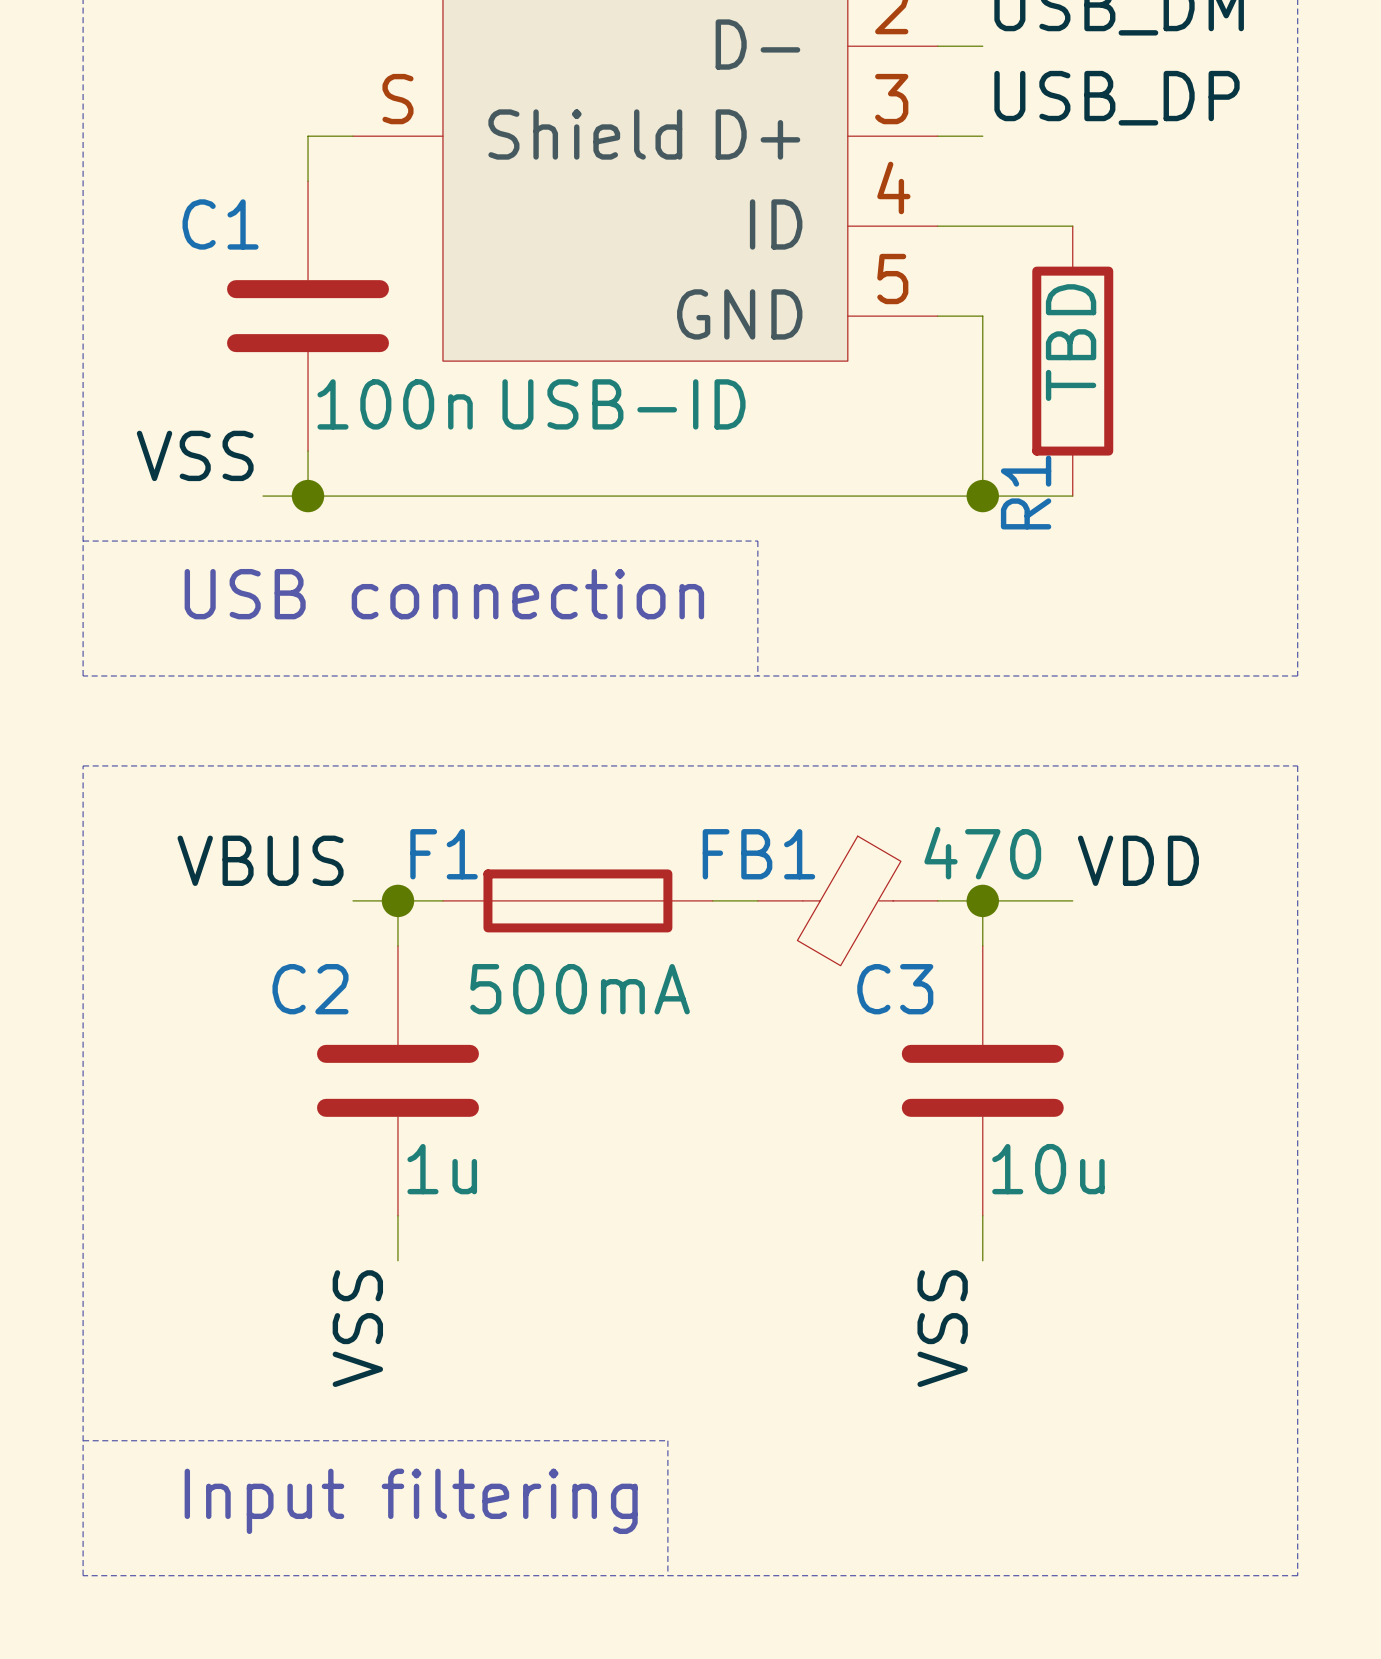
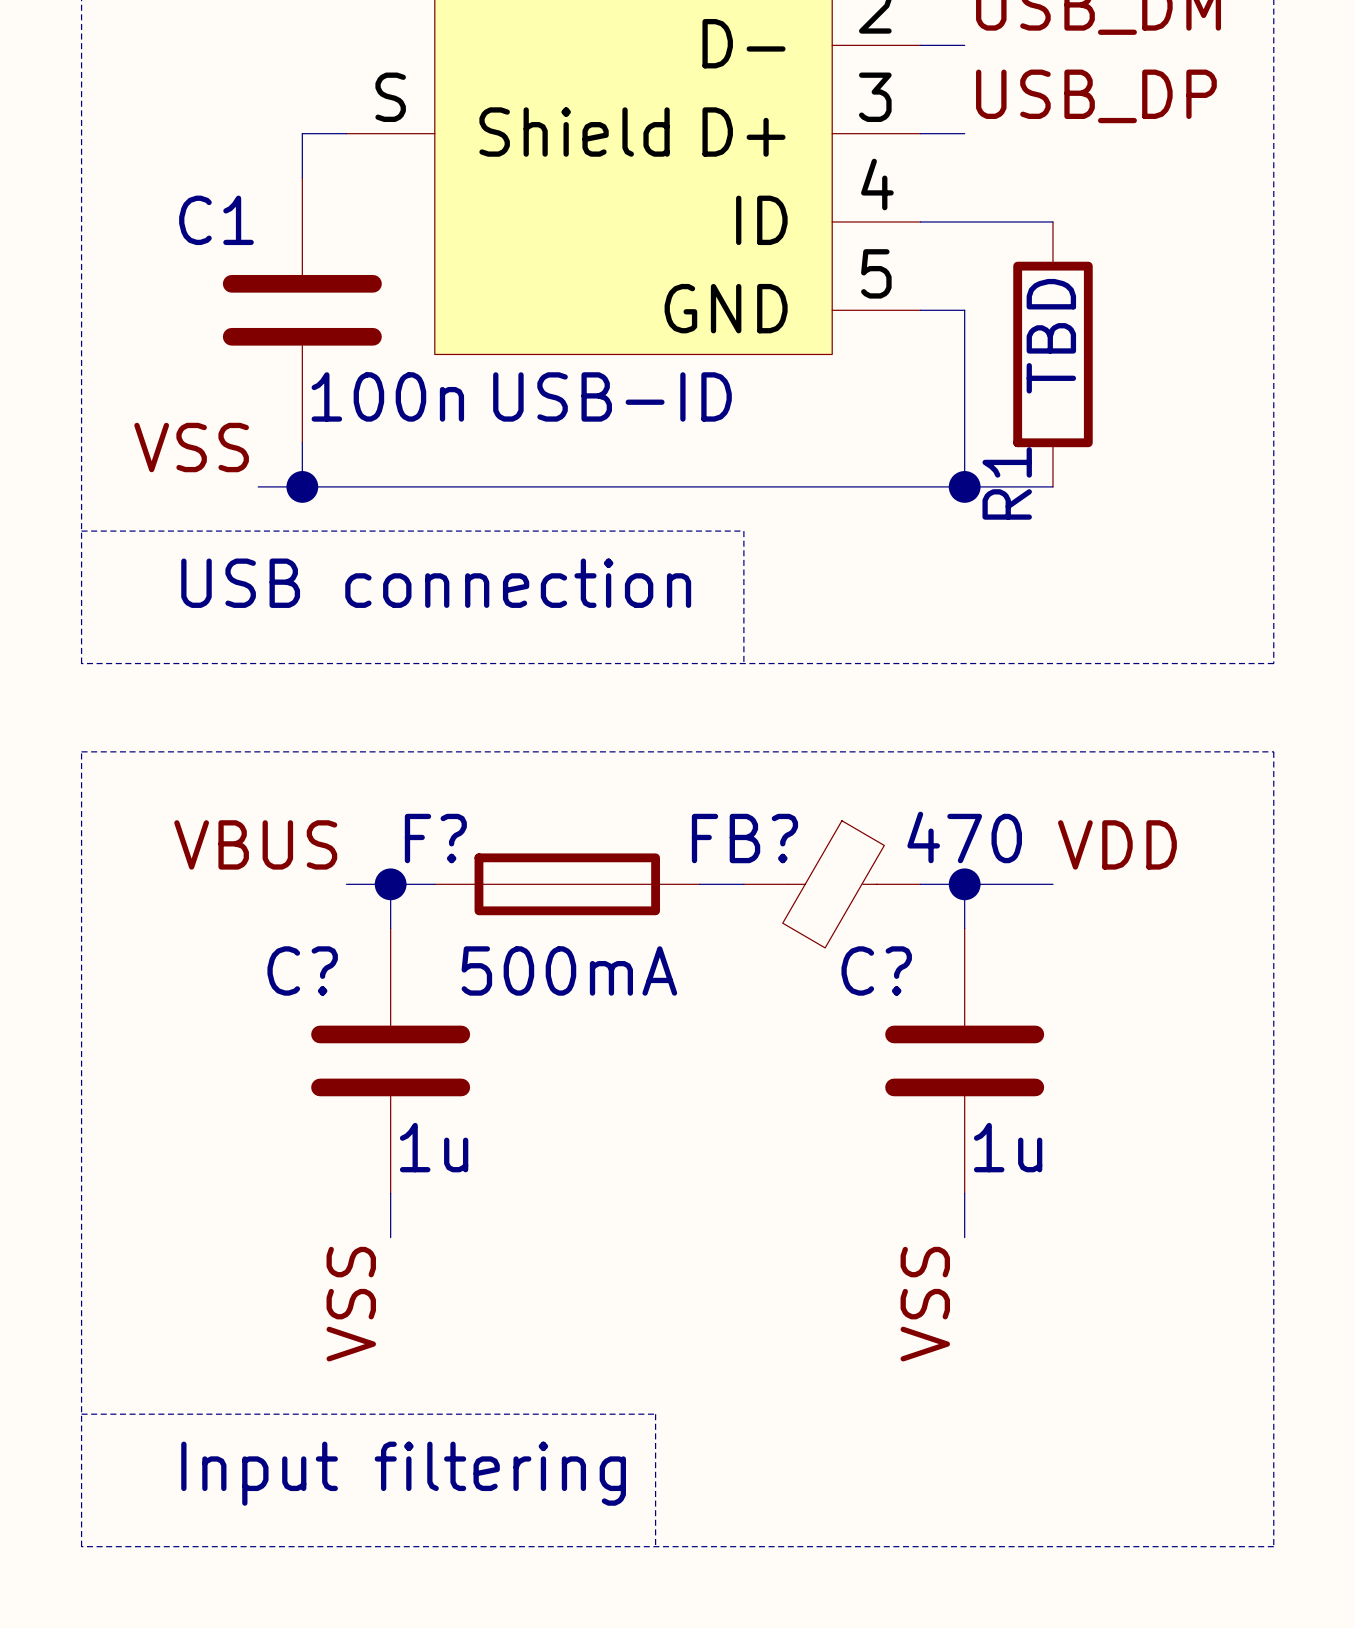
F1 name: F1 (444, 854) -> F? (435, 838)
FB1 name: FB1 (758, 854) -> FB? (744, 838)
C2 name: C2 (310, 989) -> C? (302, 970)
C3 name: C3 (895, 989) -> C? (876, 970)
C3 value: 10u (1048, 1169) -> 1u (1008, 1147)

